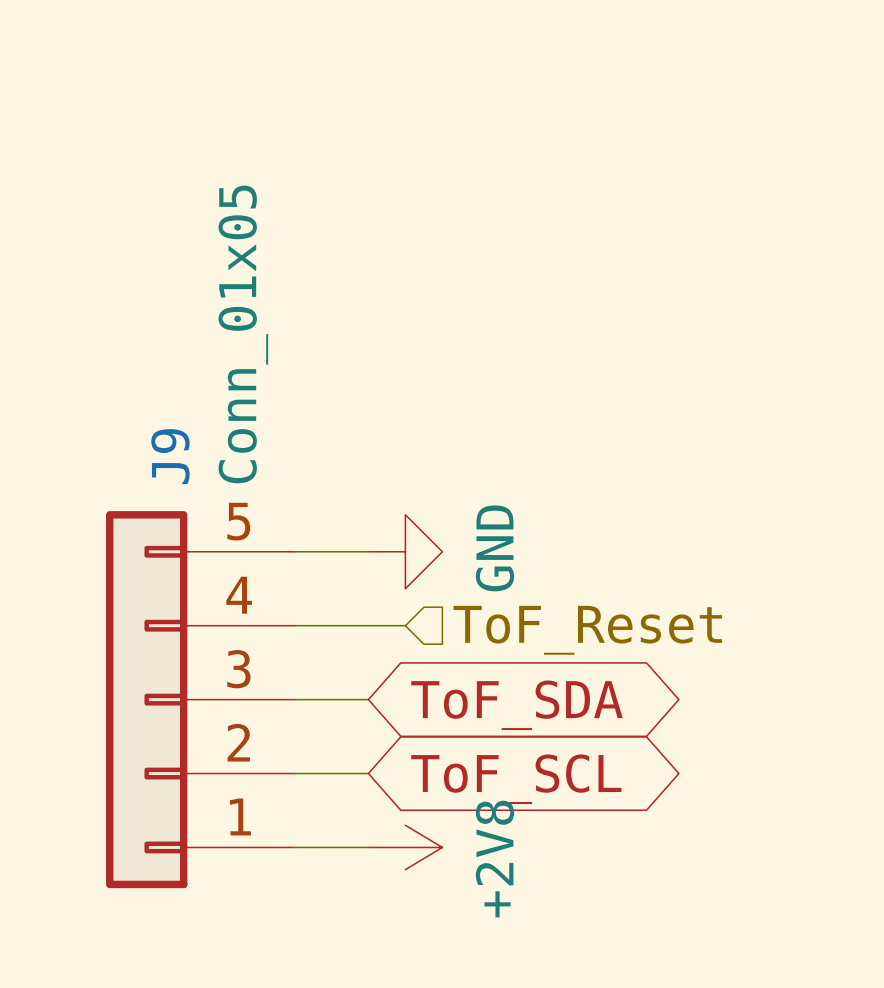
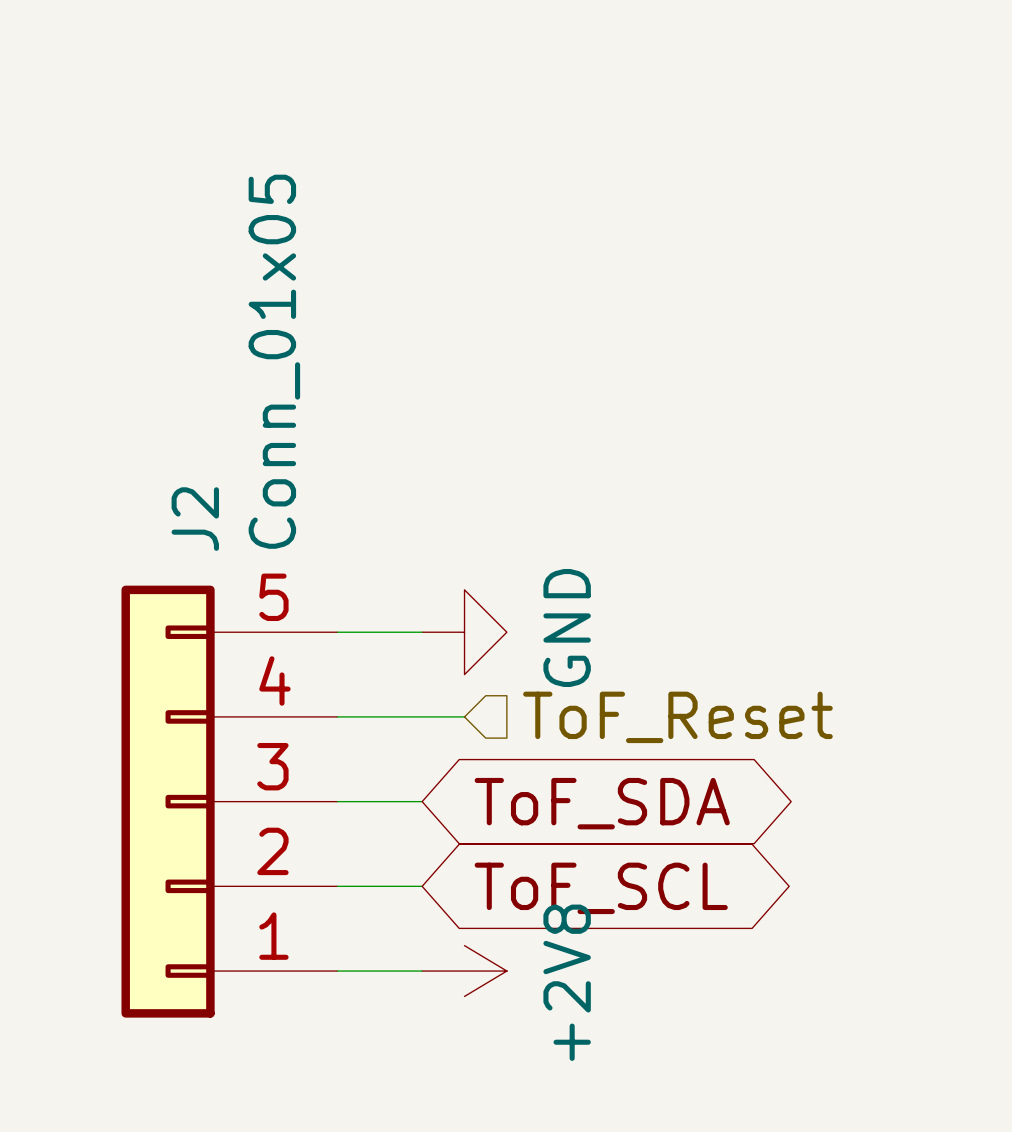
J9 name: J9 (170, 456) -> J2 (195, 519)

